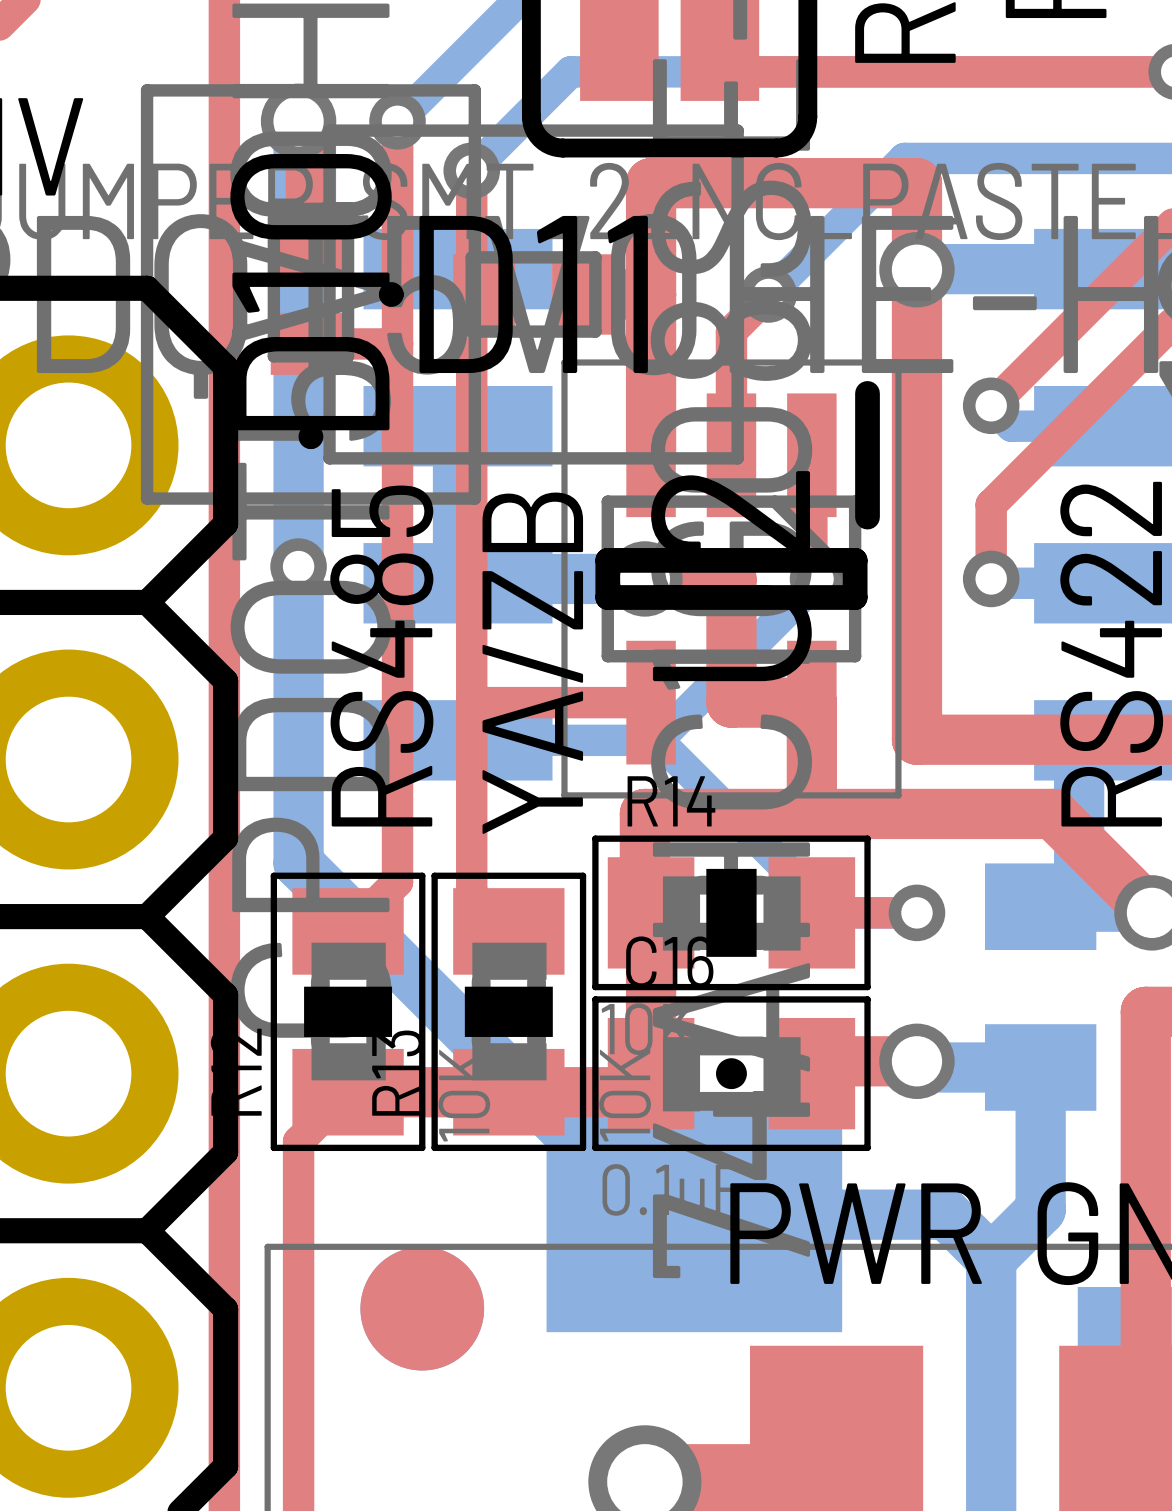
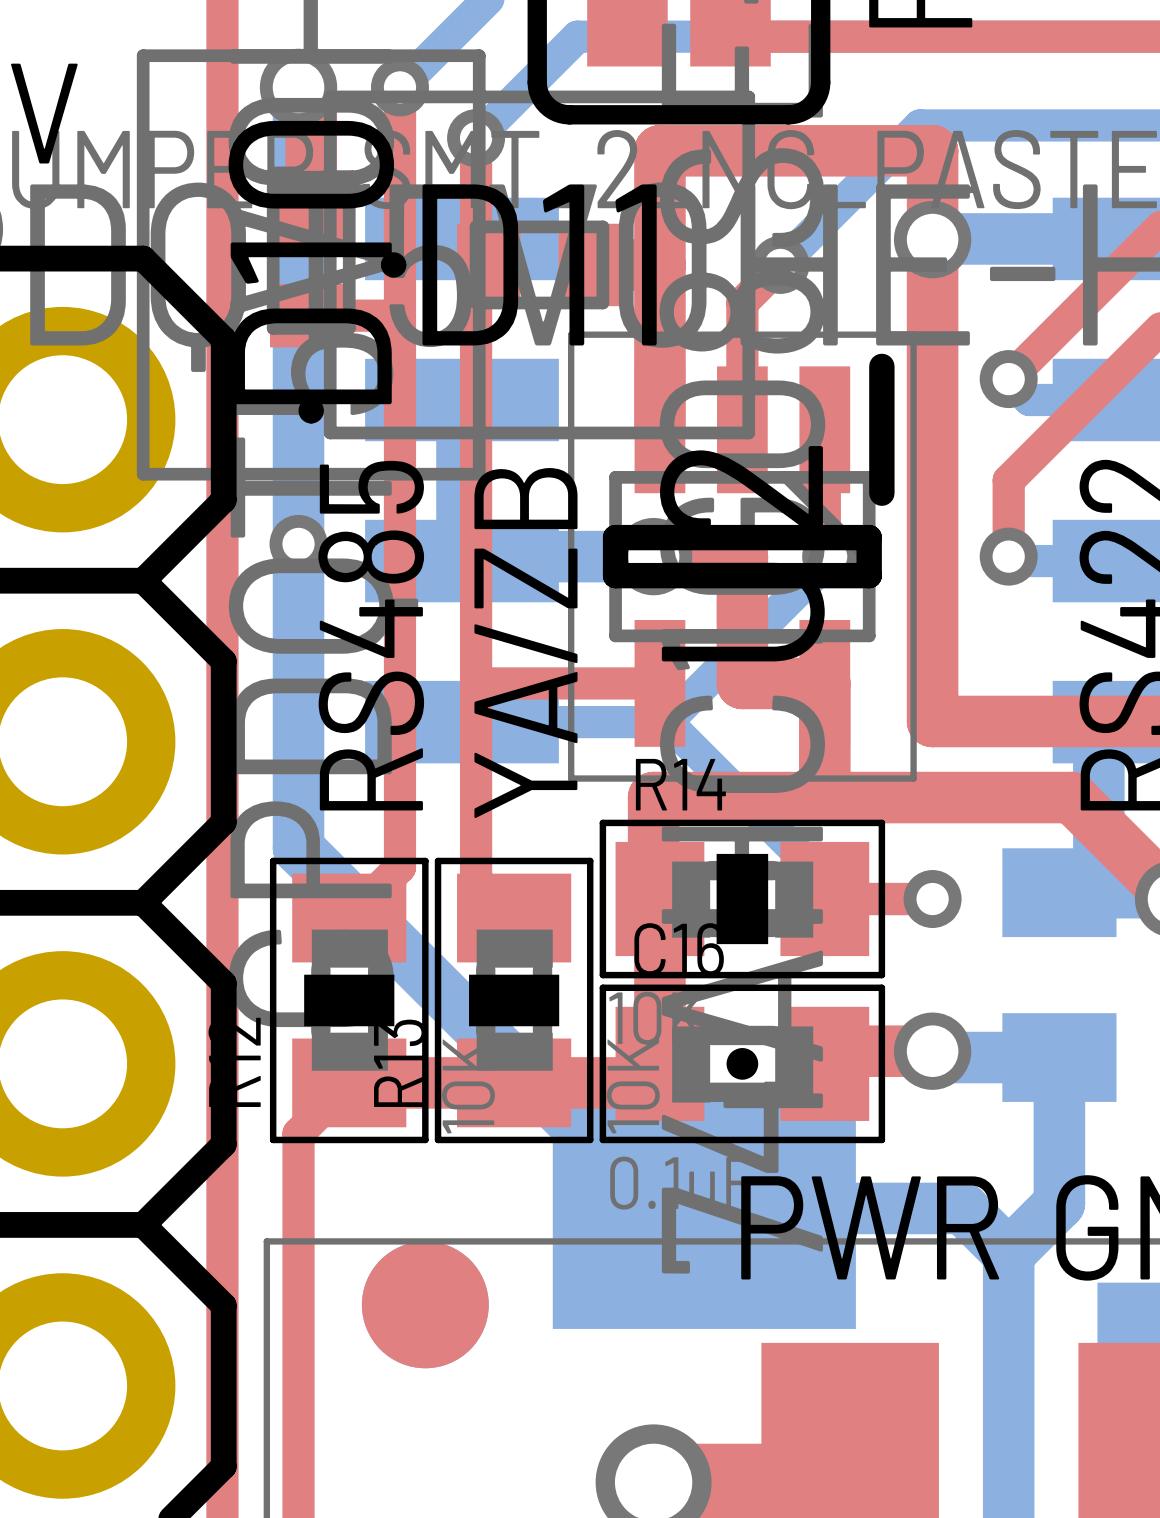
text position: RS485 (381, 656) -> RS485 (371, 635)
text position: YA/ZB (532, 663) -> YA/ZB (525, 643)

